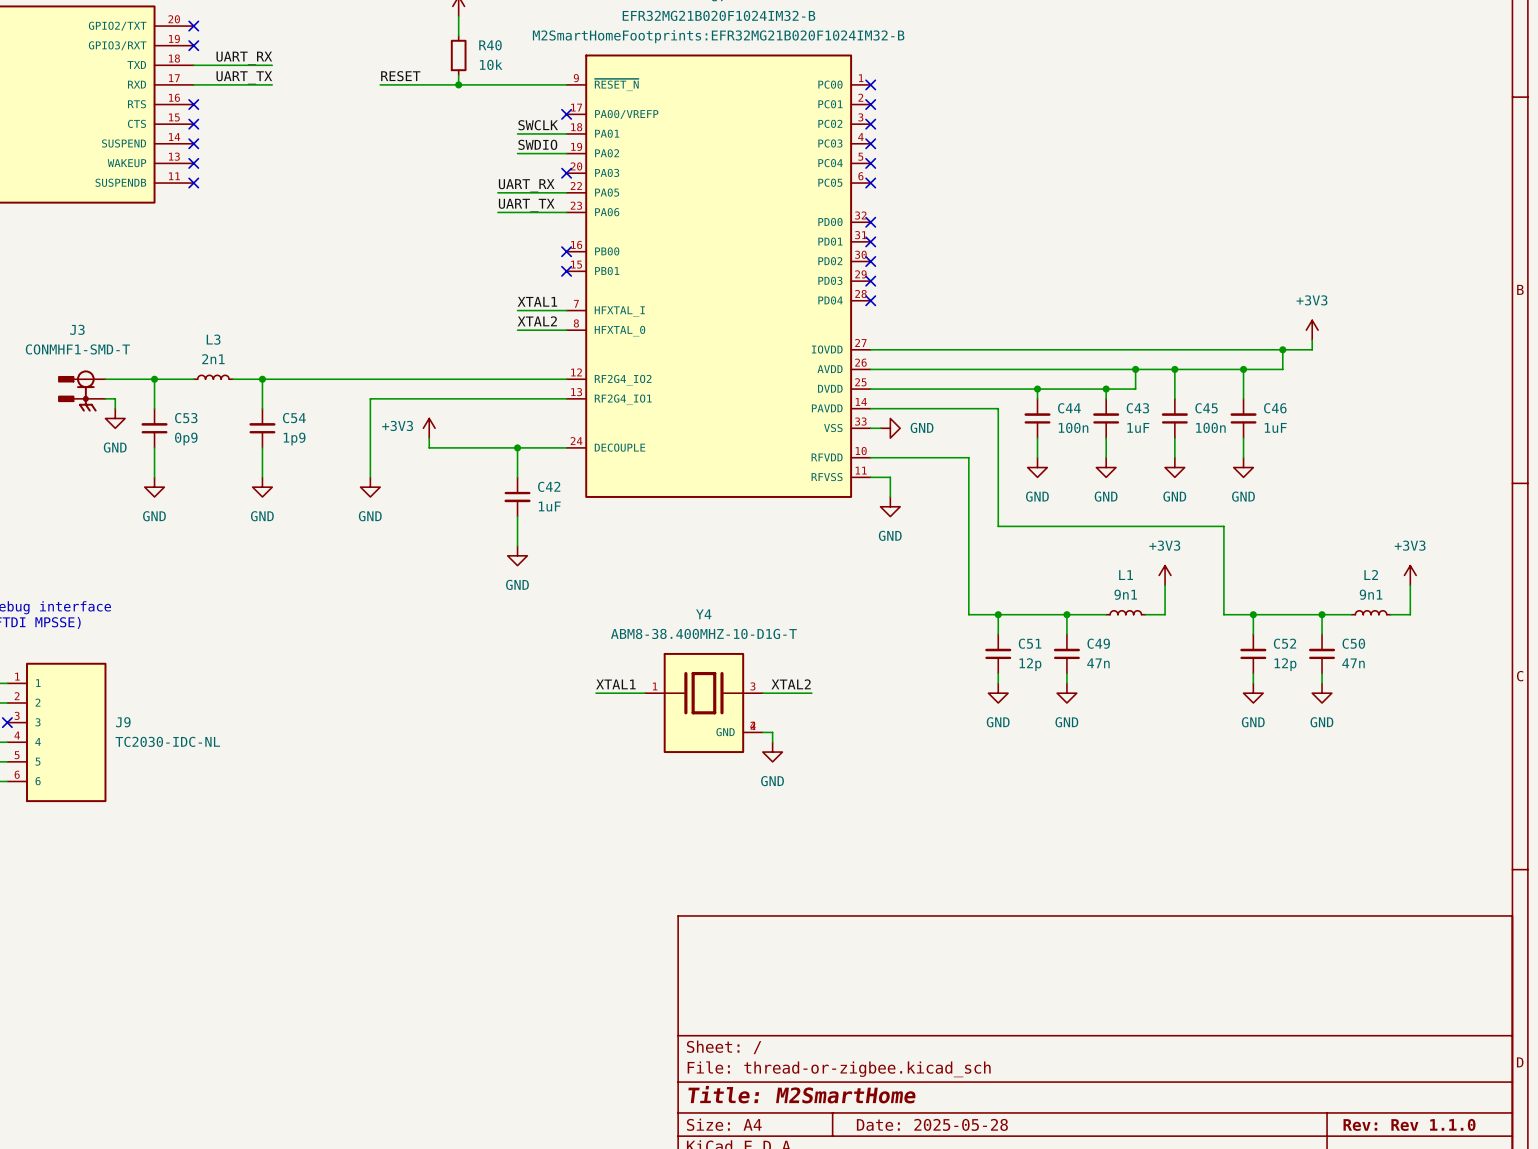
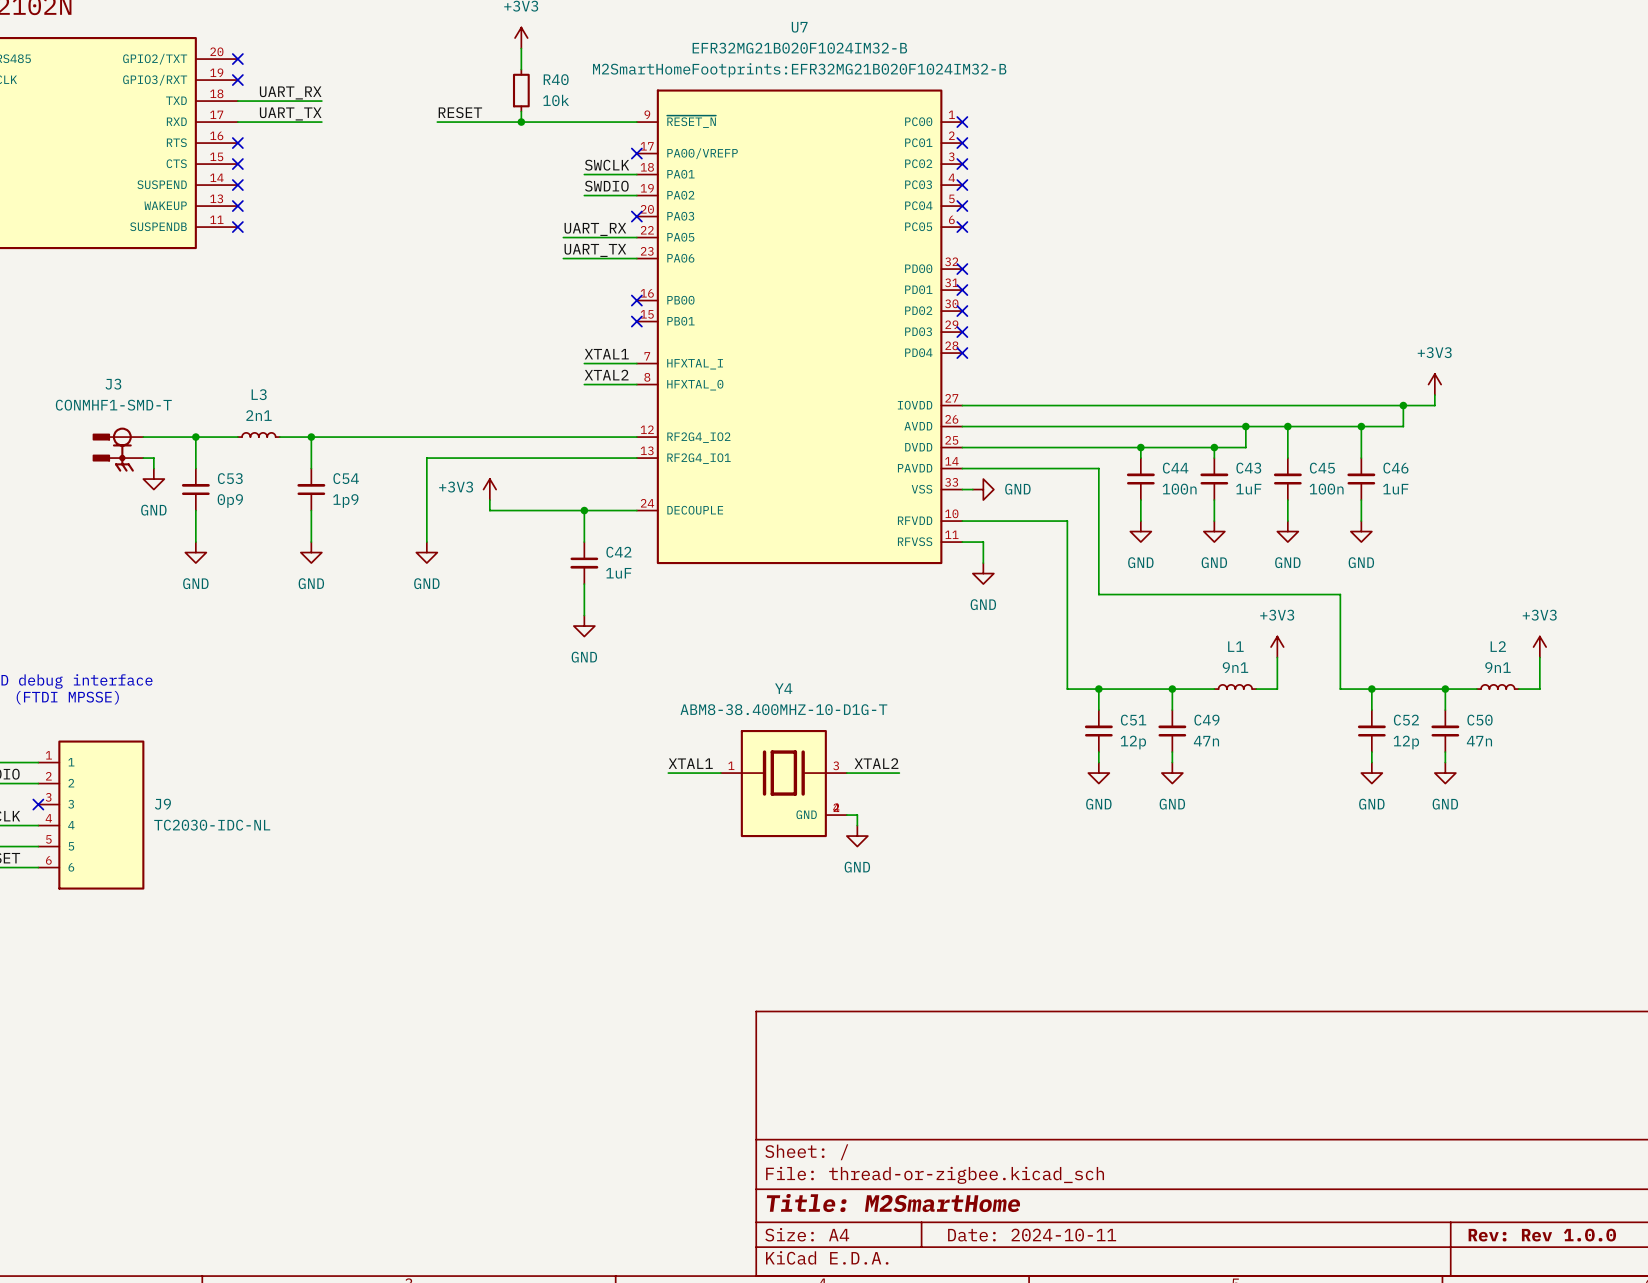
title block: Date: 2025-05-28 (932, 1124) -> Date: 2024-10-11 (1032, 1235)
title block: Rev: Rev 1.1.0 (1409, 1124) -> Rev: Rev 1.0.0 (1542, 1235)

